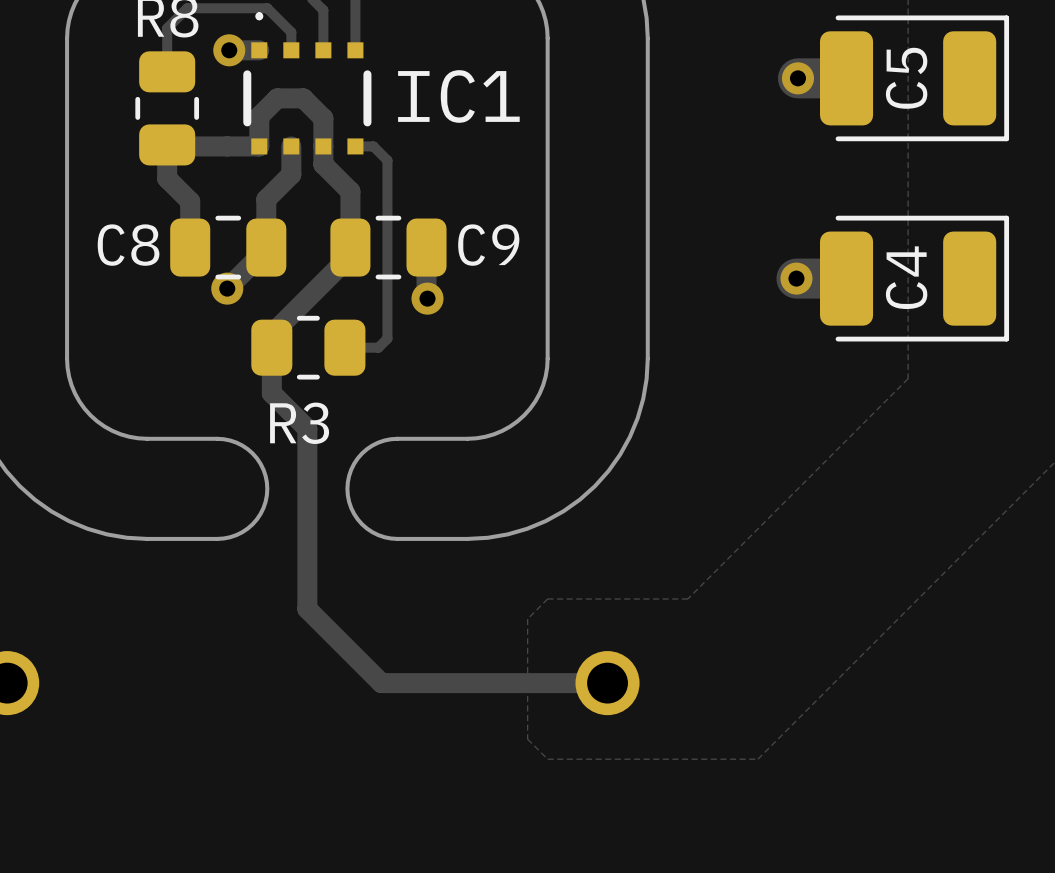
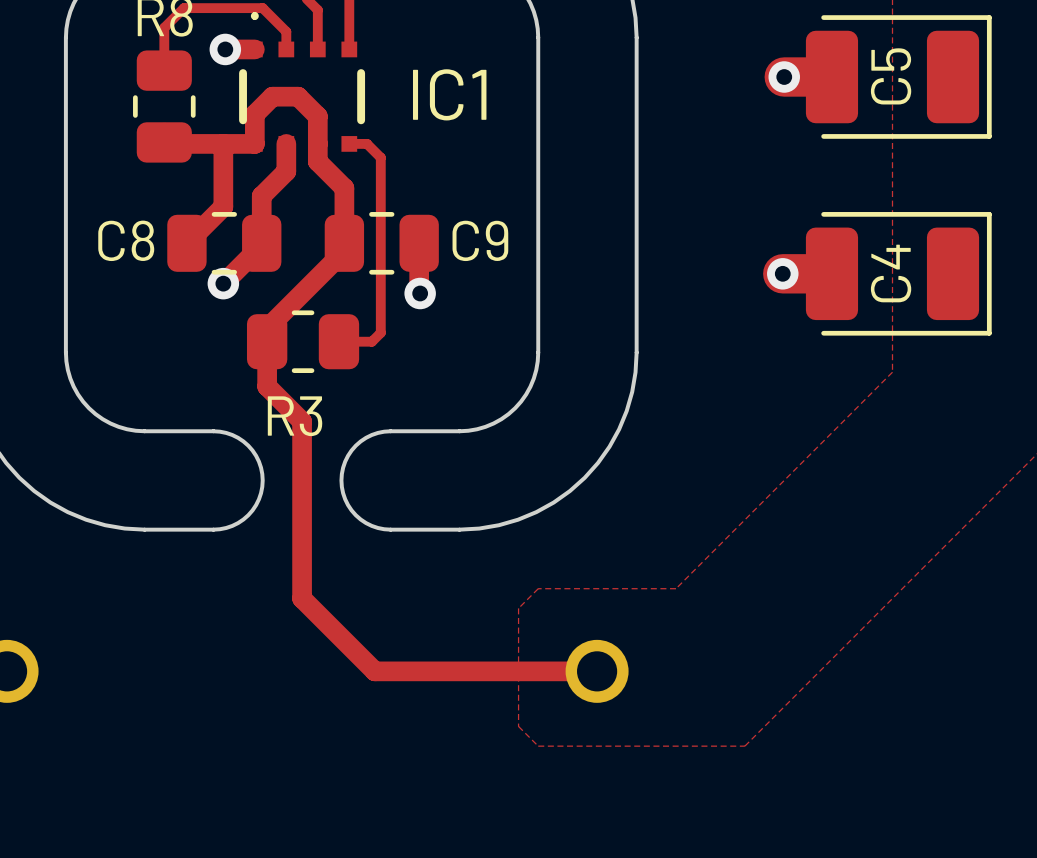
track: (167, 144) (167, 178) (190, 201) (190, 247) -> (223, 143) (223, 206) (186, 243)

